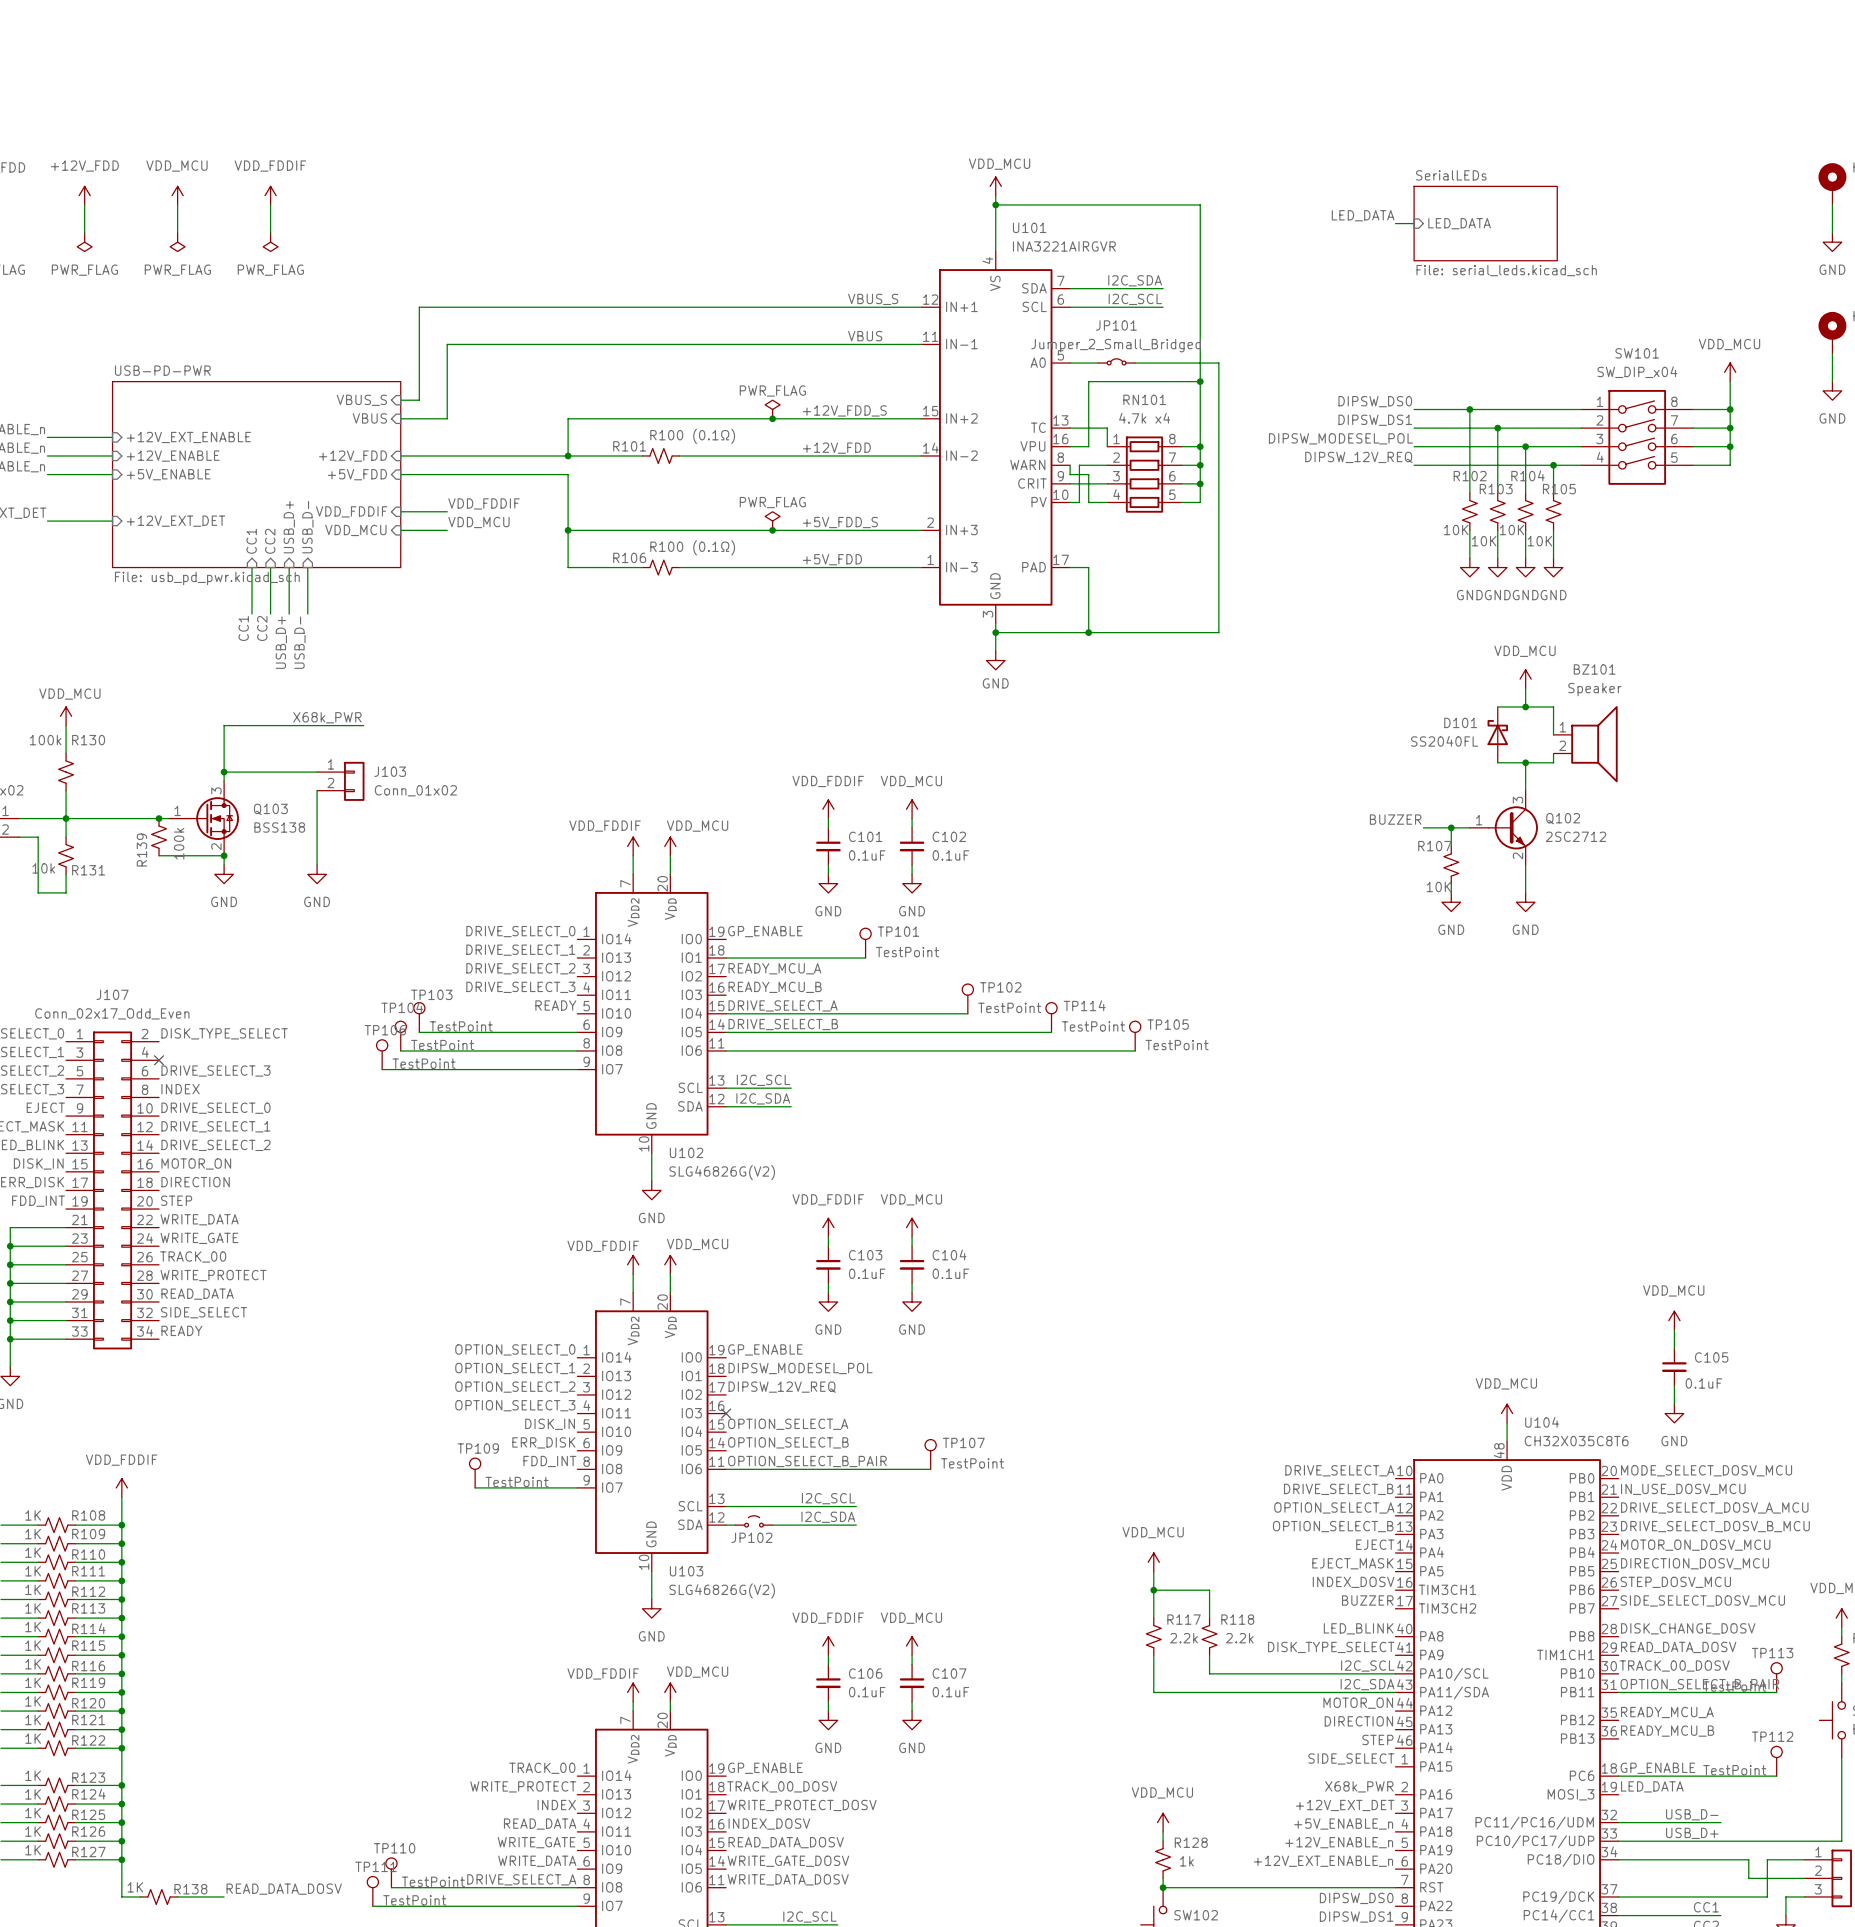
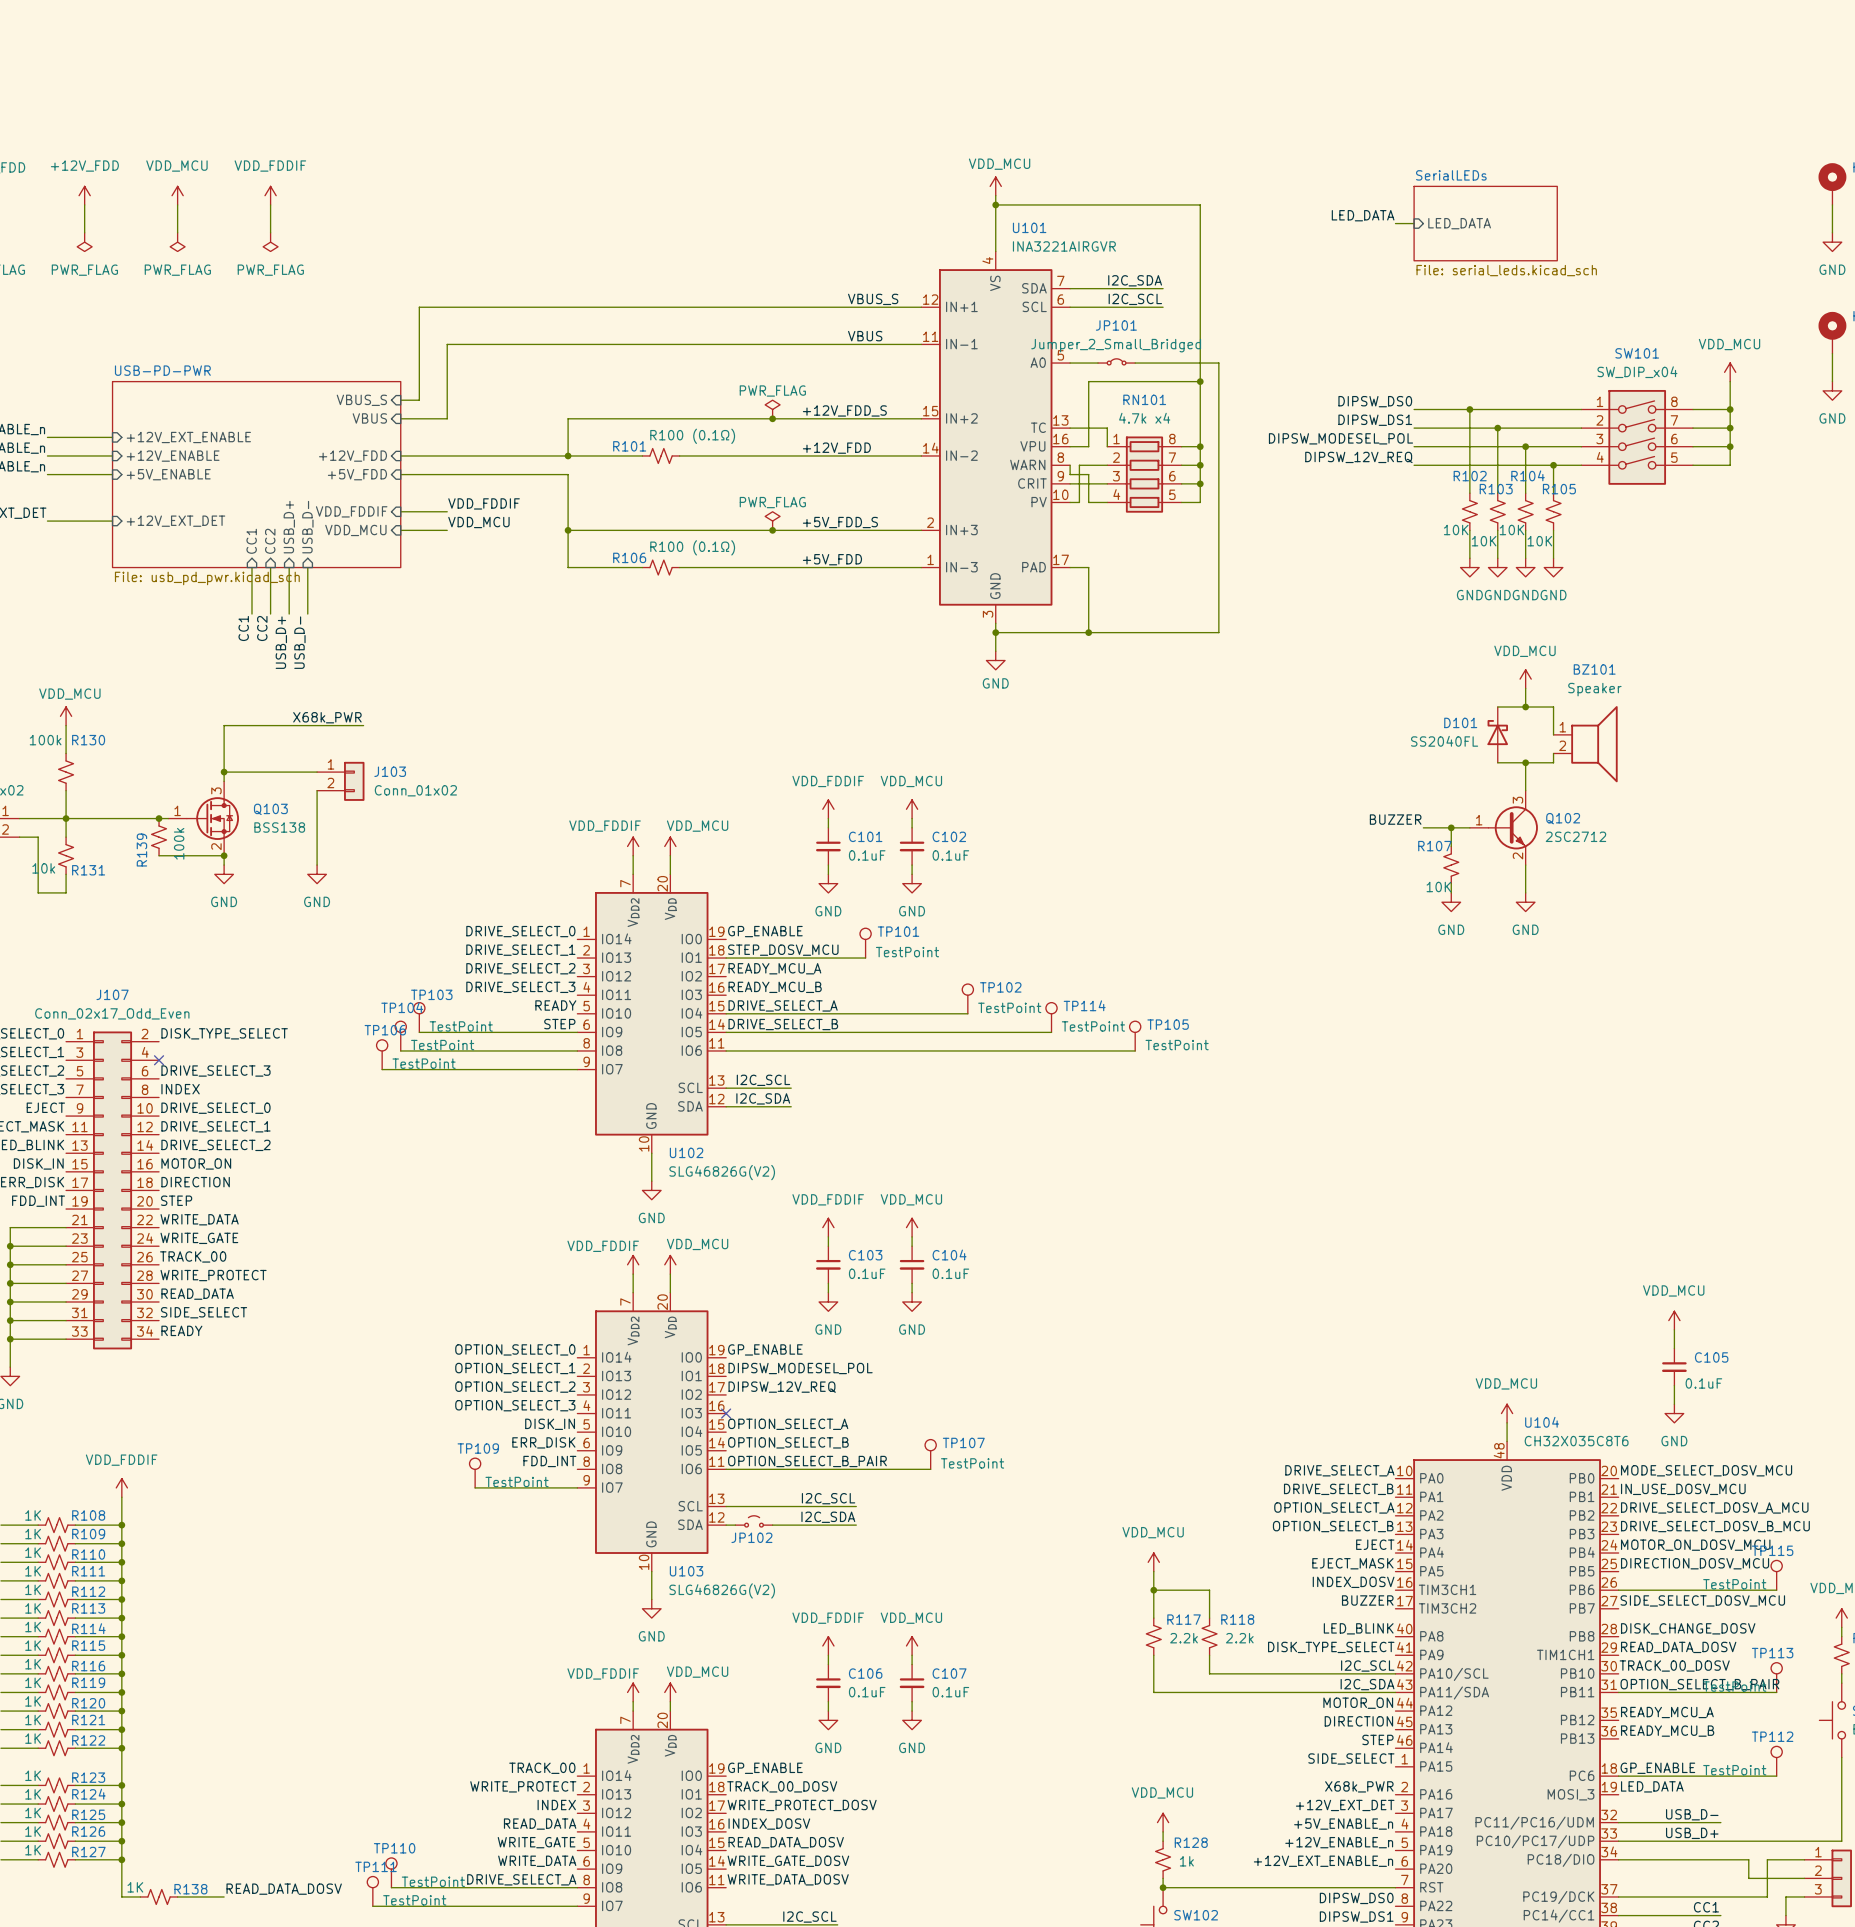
label: none -> STEP_DOSV_MCU (783, 950)
label: none -> STEP (559, 1024)
TP115: none -> TestPoint (1776, 1575)
label: STEP_DOSV_MCU (1675, 1582) -> none
wire: none -> (1618, 1590) (1776, 1590)

